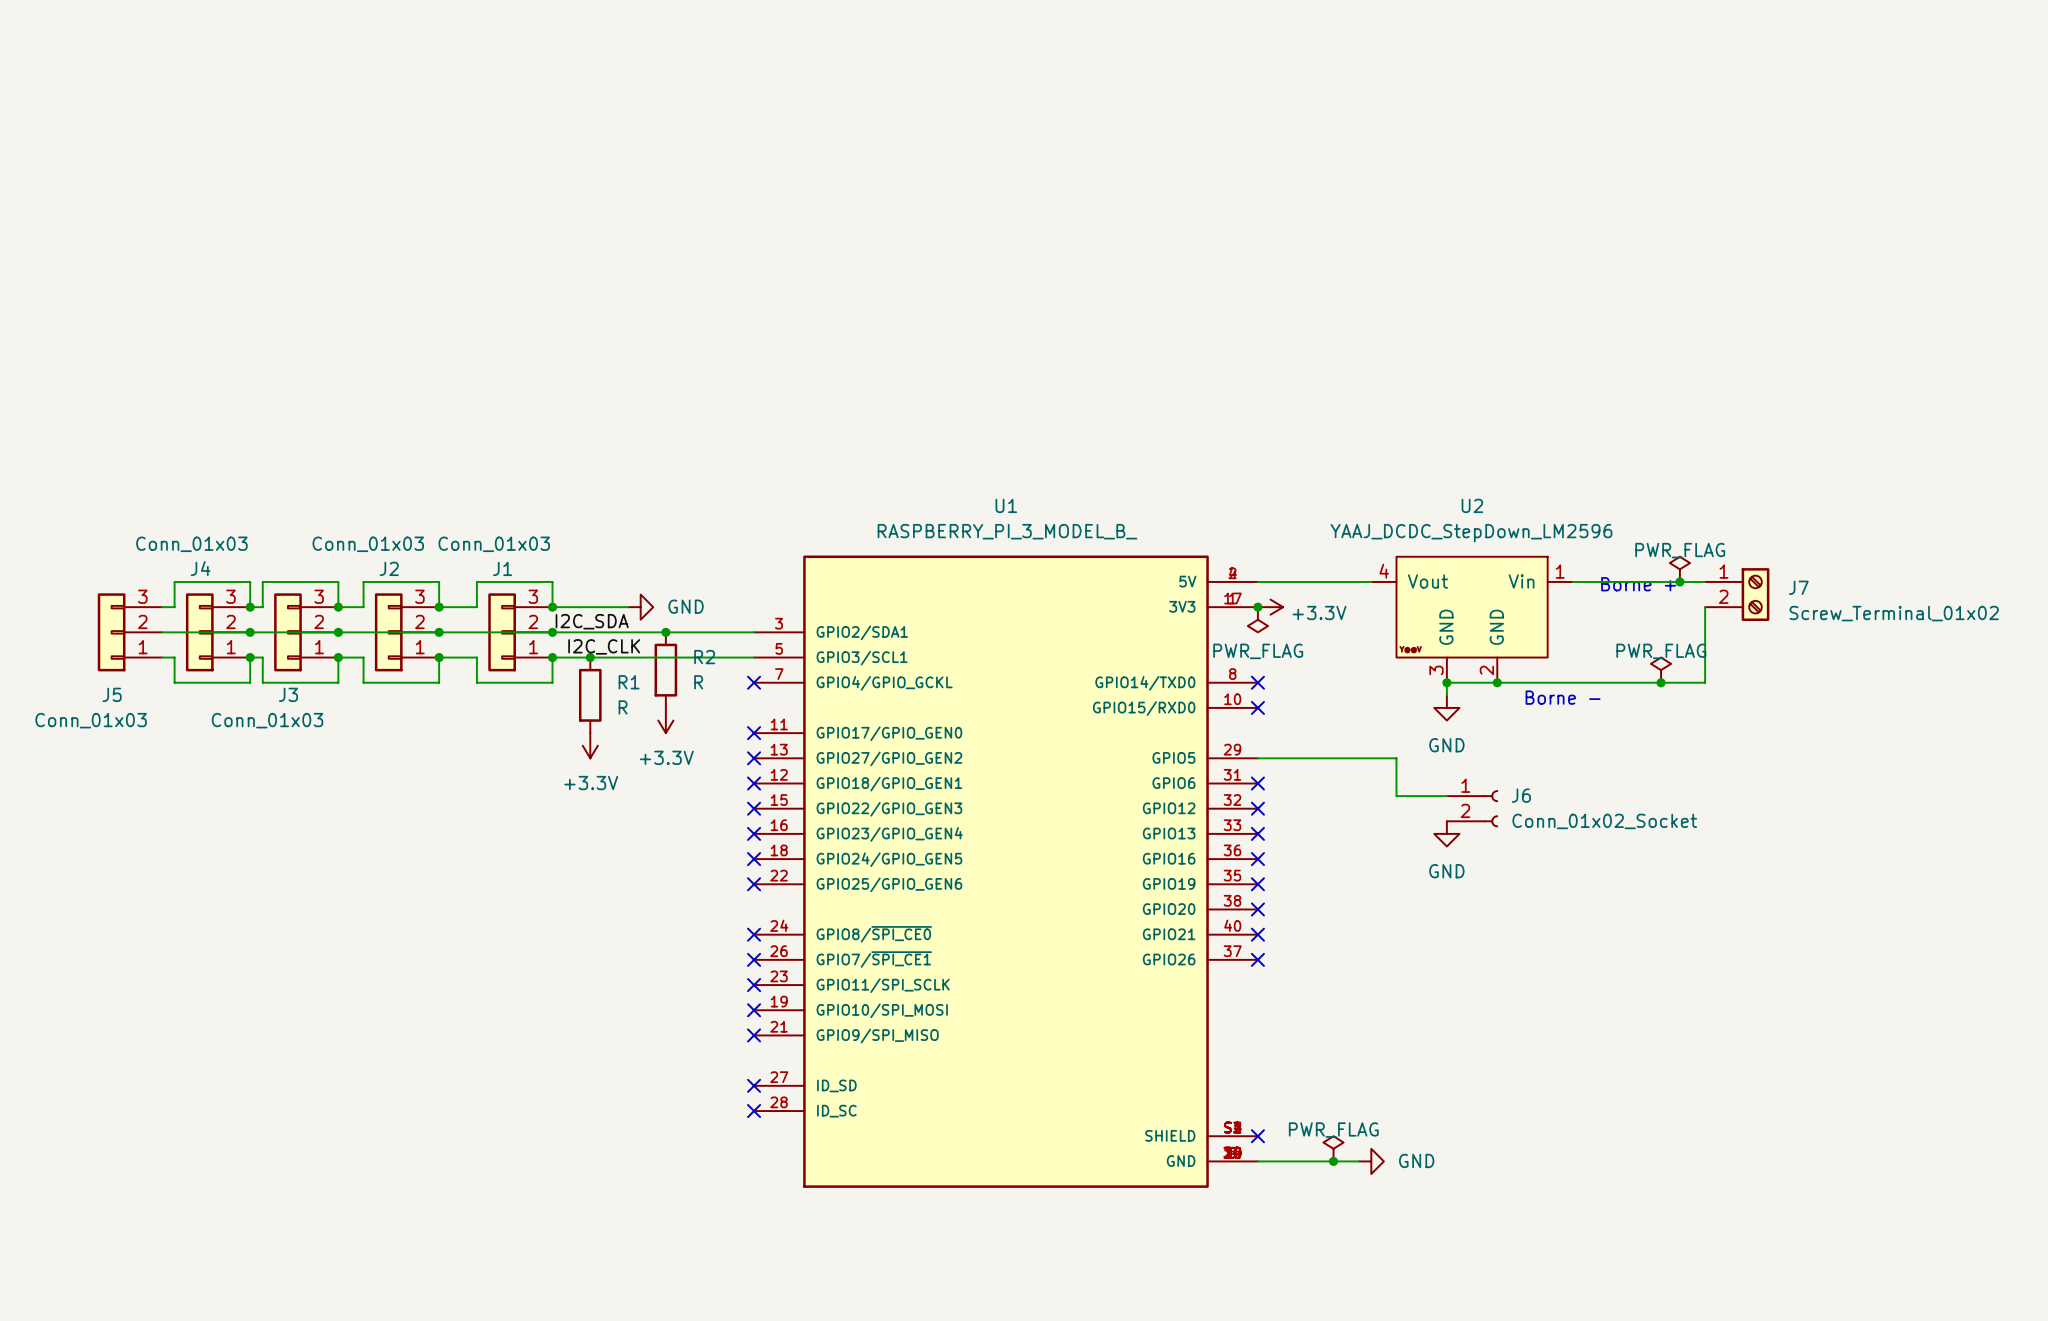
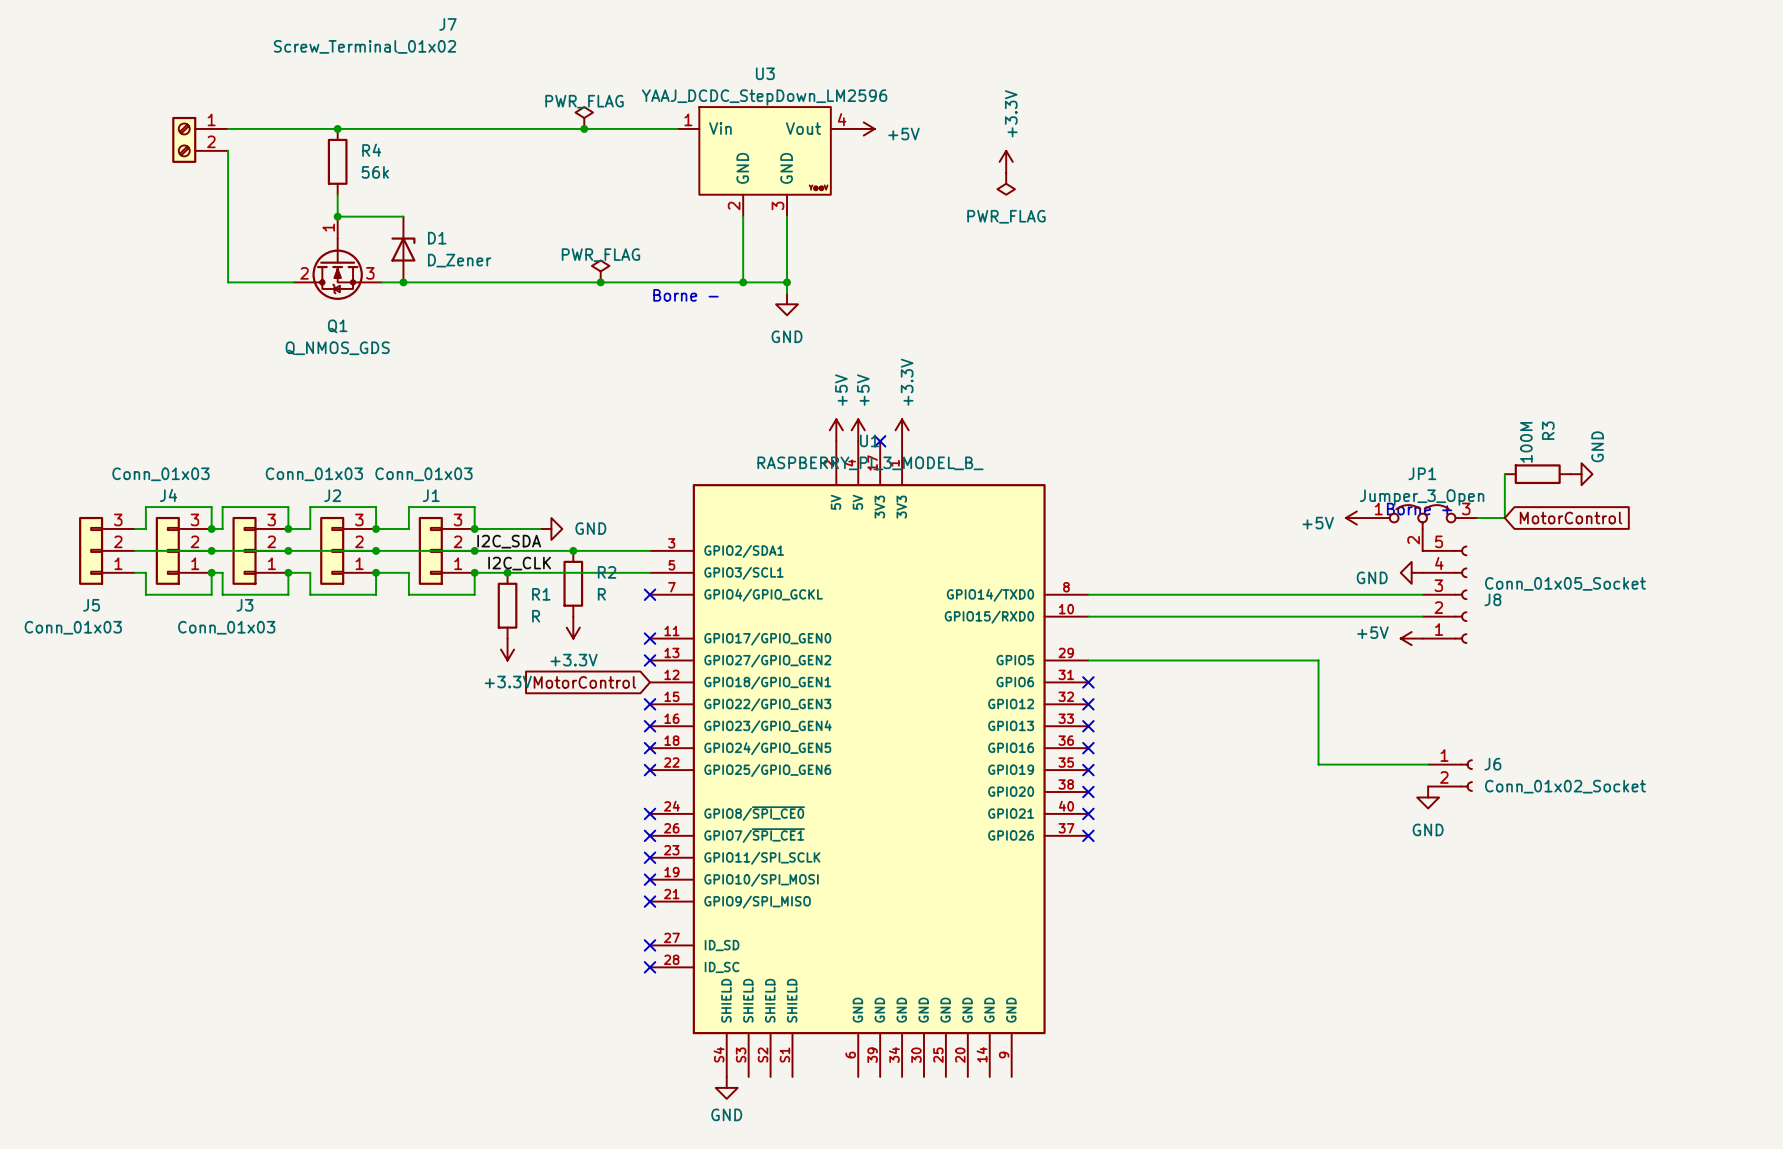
power symbol: none -> PWR_FLAG (584, 118)
wire: none -> (228, 128) (677, 128)
junction: none -> (337, 128)
junction: none -> (584, 128)
power symbol: none -> +5V (863, 128)
wire: none -> (228, 150) (228, 282) (293, 282)
R4: none -> 56k (337, 161)
U3: none -> YAAJ_DCDC_StepDown_LM2596 (765, 161)
power symbol: none -> +3.3V (1006, 161)
power symbol: none -> PWR_FLAG (1006, 183)
wire: none -> (337, 194) (337, 216) (403, 216)
junction: none -> (337, 216)
wire: none -> (743, 216) (743, 282)
wire: none -> (787, 216) (787, 293)
D1: none -> D_Zener (403, 249)
Q1: none -> Q_NMOS_GDS (337, 258)
power symbol: none -> PWR_FLAG (600, 271)
wire: none -> (381, 282) (787, 282)
junction: none -> (403, 282)
junction: none -> (600, 282)
junction: none -> (743, 282)
junction: none -> (787, 282)
text: none -> Borne - (685, 295)
power symbol: none -> GND (787, 304)
power symbol: none -> +5V (836, 430)
power symbol: none -> +5V (858, 430)
power symbol: none -> +3.3V (902, 430)
no-connect mark: none -> (880, 441)
wire: none -> (1504, 474) (1504, 518) (1477, 518)
R3: none -> 100M (1537, 474)
power symbol: none -> GND (1581, 474)
U1 symbol: [754, 555, 1258, 1188] -> [650, 441, 1089, 1077]
power symbol: PWR_FLAG (1679, 569) -> none
wire: (1257, 581) (1371, 581) -> none
wire: (1572, 581) (1705, 581) -> none
junction: (1679, 581) -> none
J7 name position: J7 (1798, 587) -> J7 (447, 24)
power symbol: none -> +5V (1356, 518)
J7 position: (1737, 594) -> (200, 139)
J7 flip: as is (1755, 594) -> left-right (184, 139)
global label: none -> MotorControl (1571, 518)
JP1: none -> Jumper_3_Open (1422, 527)
junction: (1257, 607) -> none
power symbol: +3.3V (1270, 607) -> none
wire: (1705, 607) (1705, 682) (1642, 682) -> none
J7 value position: Screw_Terminal_01x02 (1894, 613) -> Screw_Terminal_01x02 (365, 46)
power symbol: PWR_FLAG (1257, 619) -> none
U2: YAAJ_DCDC_StepDown_LM2596 (1472, 619) -> none
power symbol: none -> GND (1411, 572)
power symbol: PWR_FLAG (1661, 670) -> none
no-connect mark: (1257, 682) -> none
wire: (1446, 682) (1446, 695) -> (1252, 594) (1088, 594)
junction: (1446, 682) -> none
junction: (1497, 682) -> none
junction: (1661, 682) -> none
J8: none -> Conn_01x05_Socket (1444, 594)
text: Borne - (1563, 697) -> none
wire: none -> (1088, 616) (1422, 616)
no-connect mark: (1257, 707) -> none
power symbol: GND (1446, 707) -> none
power symbol: none -> +5V (1411, 638)
wire: (1396, 758) (1396, 796) (1446, 796) -> (1208, 660) (1318, 660) (1318, 764) (1428, 764)
global label: none -> MotorControl (584, 682)
no-connect mark: (754, 783) -> none
J6 position: (1472, 808) -> (1450, 775)
power symbol: GND (1446, 833) -> none
power symbol: none -> GND (1428, 797)
no-connect mark: (1257, 1136) -> none
power symbol: PWR_FLAG (1333, 1148) -> none
wire: (1257, 1161) (1358, 1161) -> none
junction: (1333, 1161) -> none
power symbol: GND (1371, 1161) -> none
power symbol: none -> GND (726, 1087)

